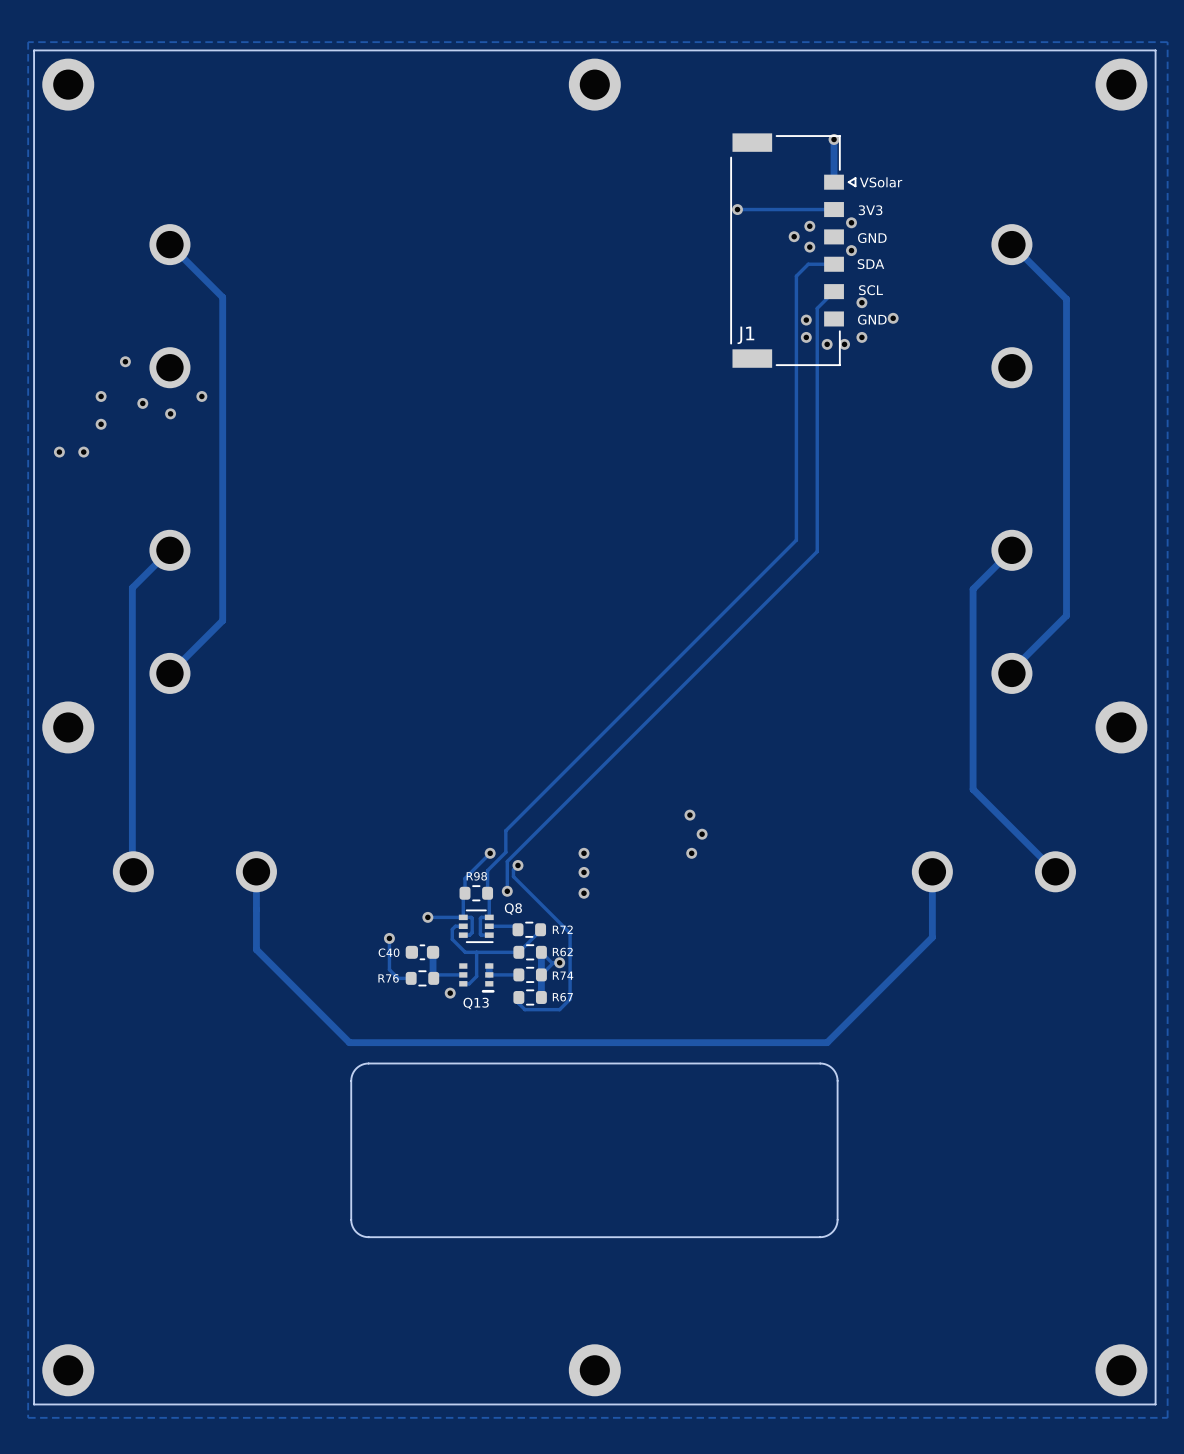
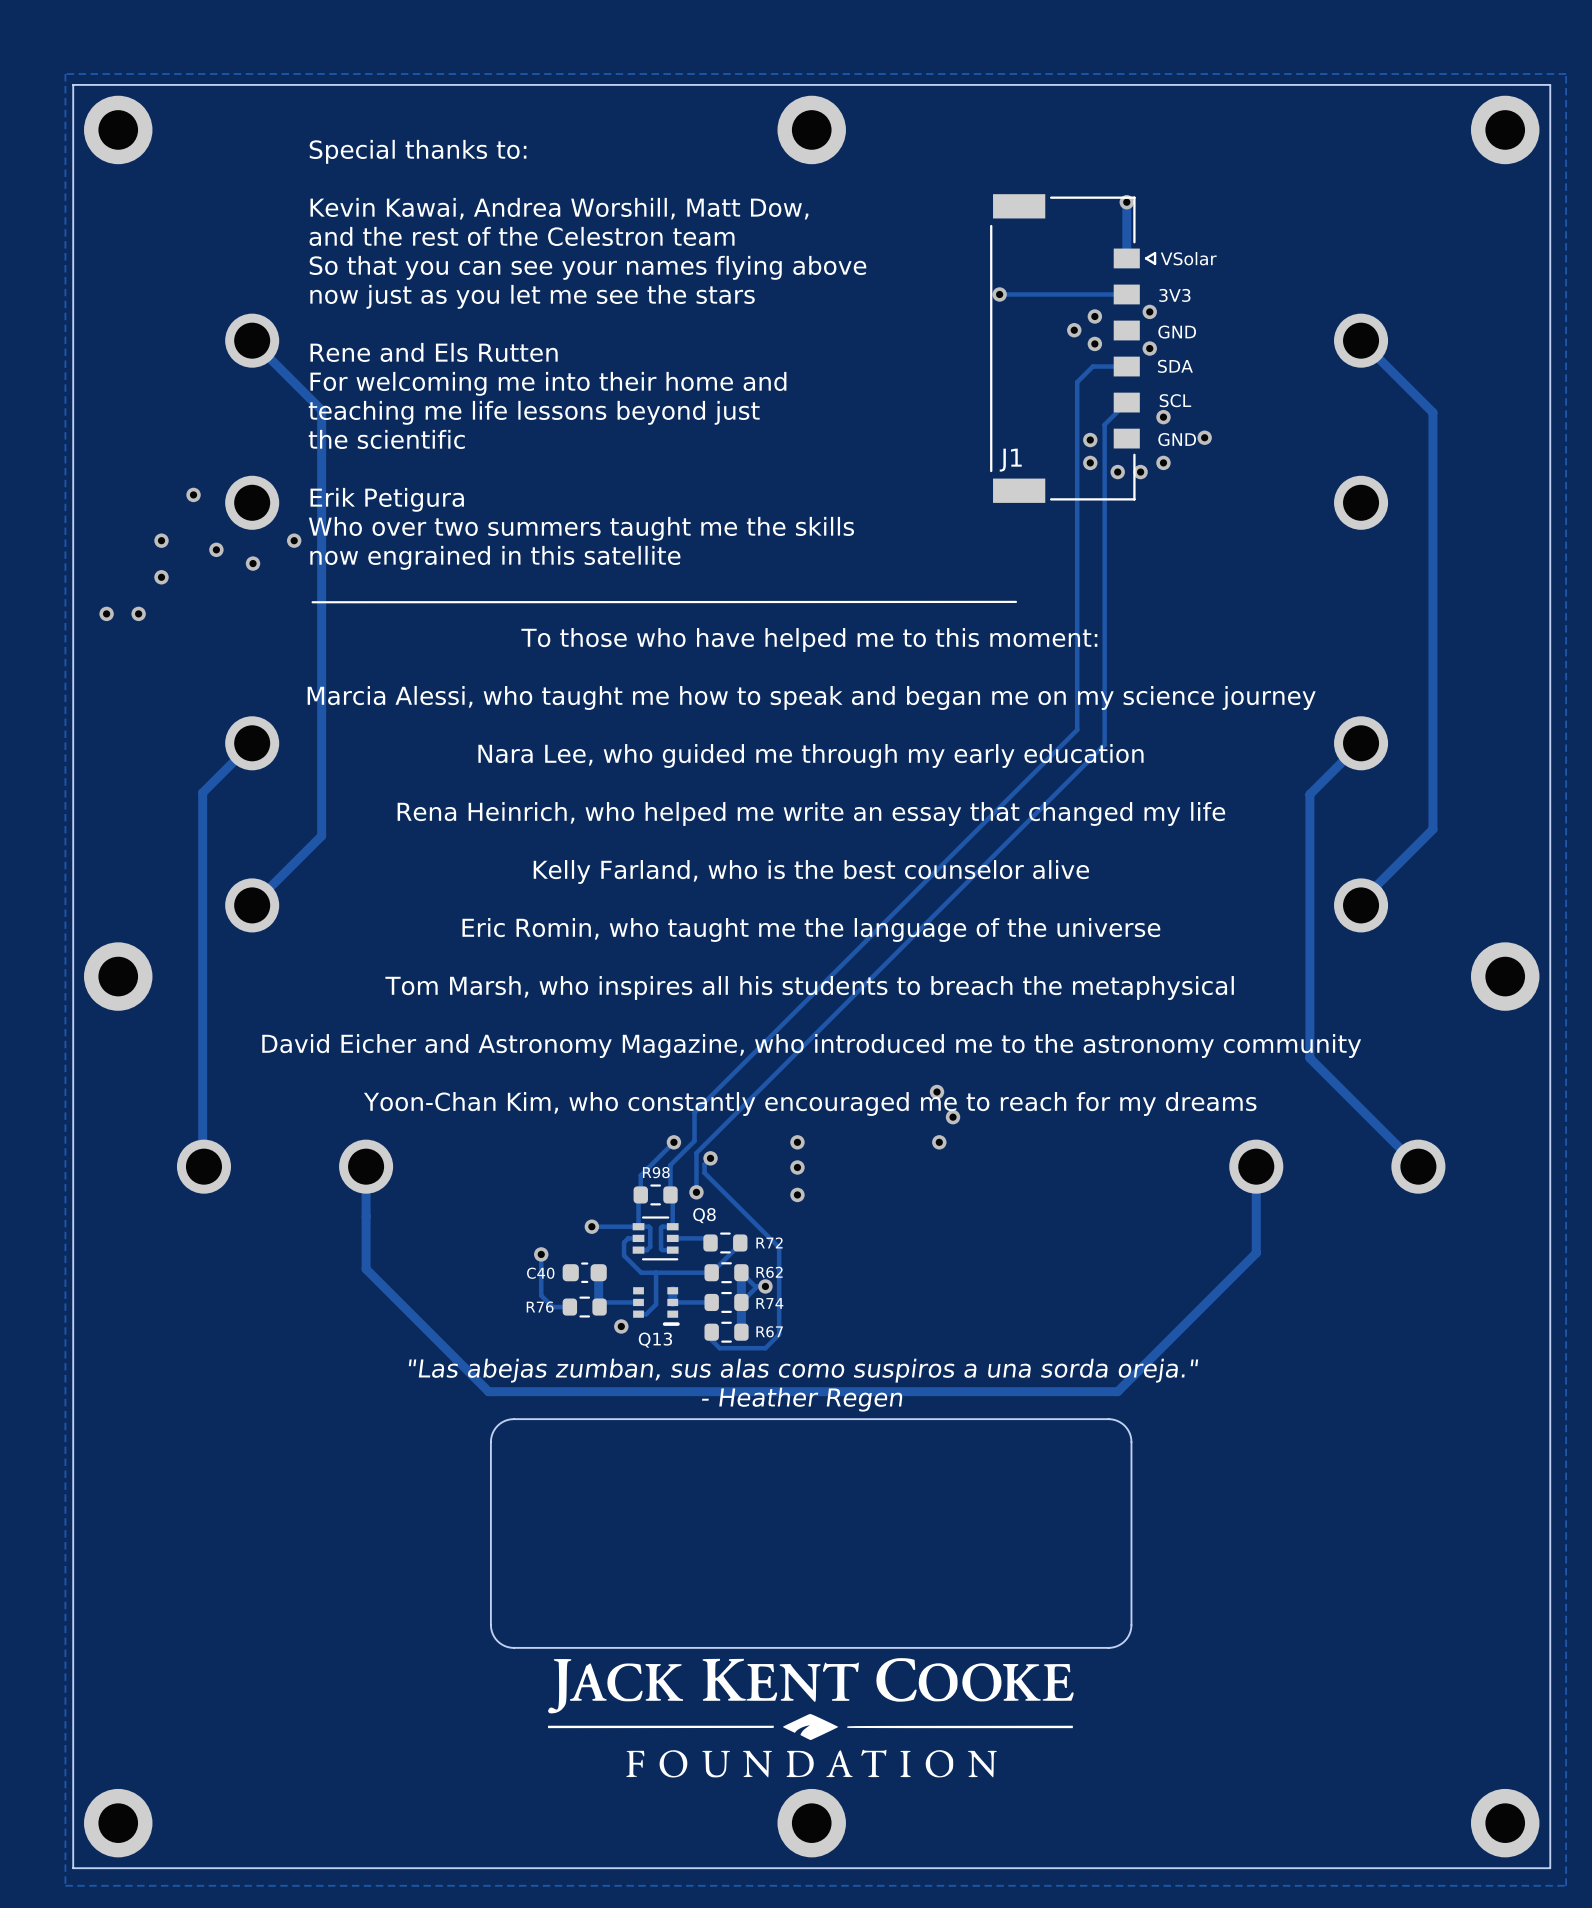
text: none -> Special thanks to: (418, 151)
text: none -> Kevin Kawai, Andrea Worshill, Matt Dow, (559, 208)
text: none -> and the rest of the Celestron team (522, 236)
text: none -> So that you can see your names flying above (587, 267)
text: none -> now just as you let me see the stars (532, 296)
text: none -> Rene and Els Rutten (434, 352)
text: none -> For welcoming me into their home and (548, 383)
text: none -> teaching me life lessons beyond just (534, 412)
text: none -> the scientific (386, 439)
text: none -> Erik Petigura (387, 499)
text: none -> Who over two summers taught me the skills (581, 528)
text: none -> now engrained in this satellite (495, 557)
line: none -> (1015, 601) (312, 602)
text: none -> To those who have helped me to this moment: (809, 639)
text: none -> Marcia Alessi, who taught me how to speak and began me on my science journey (811, 697)
text: none -> Nara Lee, who guided me through my early education (810, 755)
text: none -> Rena Heinrich, who helped me write an essay that changed my life (811, 813)
text: none -> Kelly Farland, who is the best counselor alive (811, 871)
text: none -> Eric Romin, who taught me the language of the universe (811, 929)
text: none -> Tom Marsh, who inspires all his students to breach the metaphysical (809, 987)
text: none -> David Eicher and Astronomy Magazine, who introduced me to the astronomy community (811, 1045)
text: none -> Yoon-Chan Kim, who constantly encouraged me to reach for my dreams (810, 1103)
text: none -> "Las abejas zumban, sus alas como suspiros a una sorda oreja." (803, 1370)
text: none -> - Heather Regen (802, 1399)
drawing: none -> [548, 1658, 1074, 1778]

